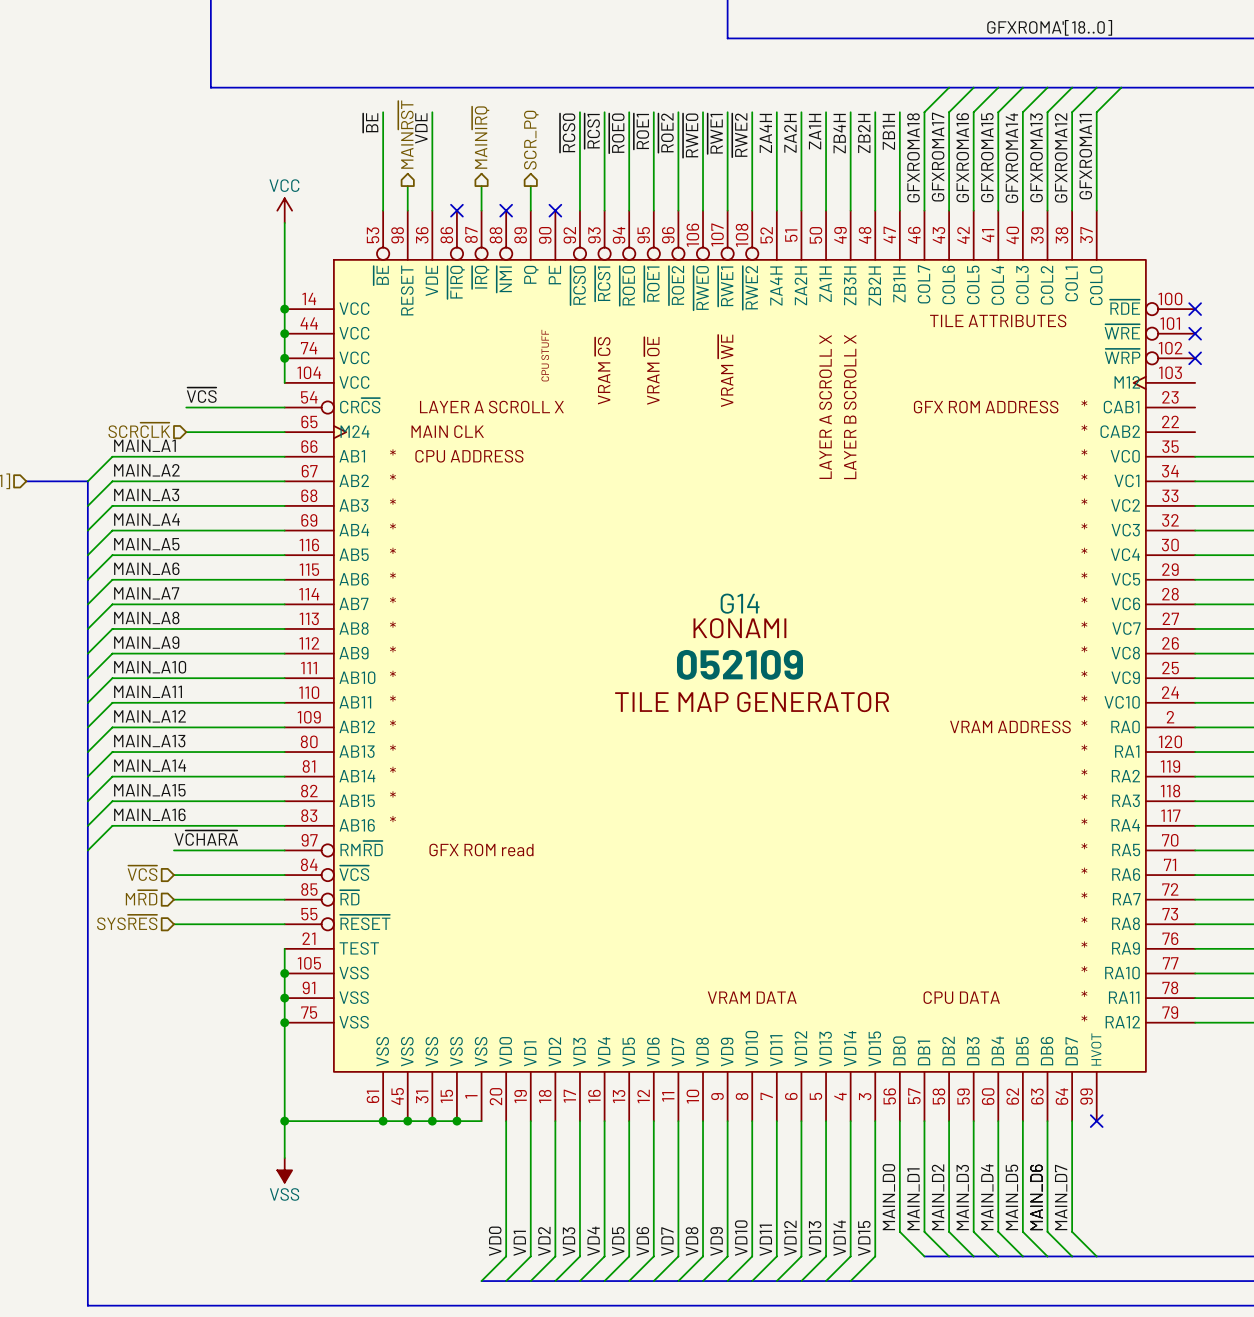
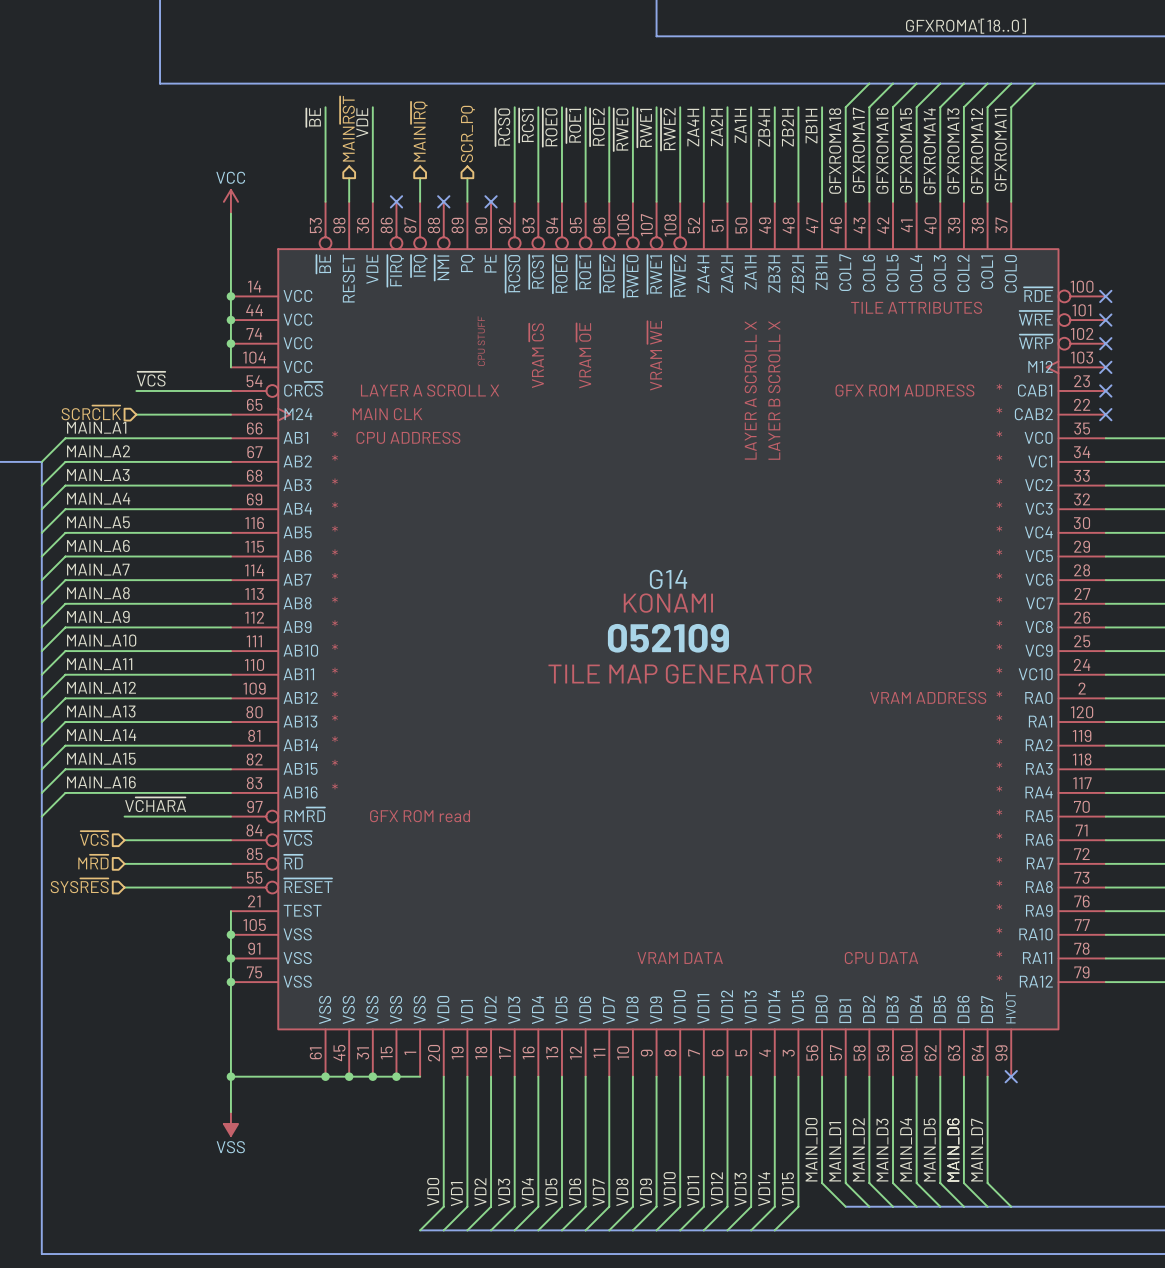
no-connect mark: none -> (1105, 367)
no-connect mark: none -> (1105, 390)
no-connect mark: none -> (1105, 414)

